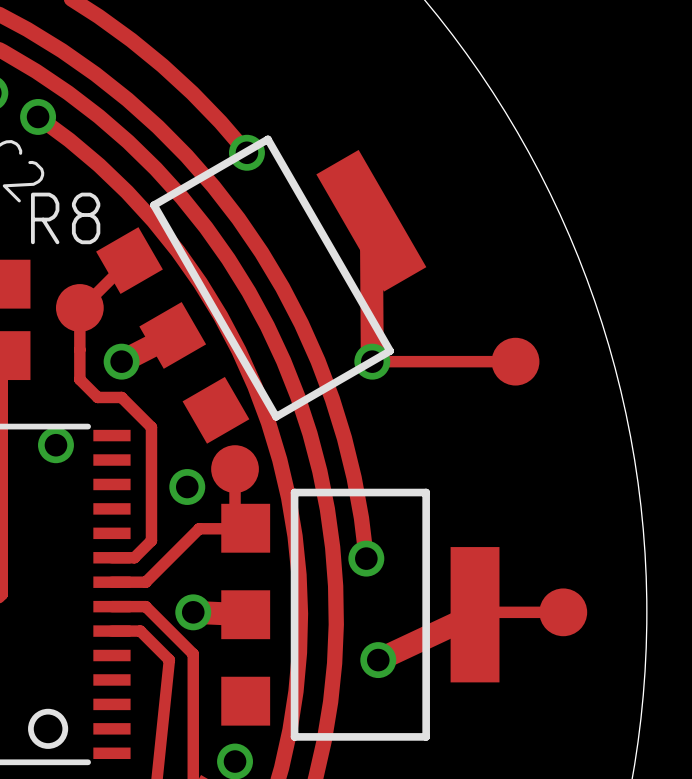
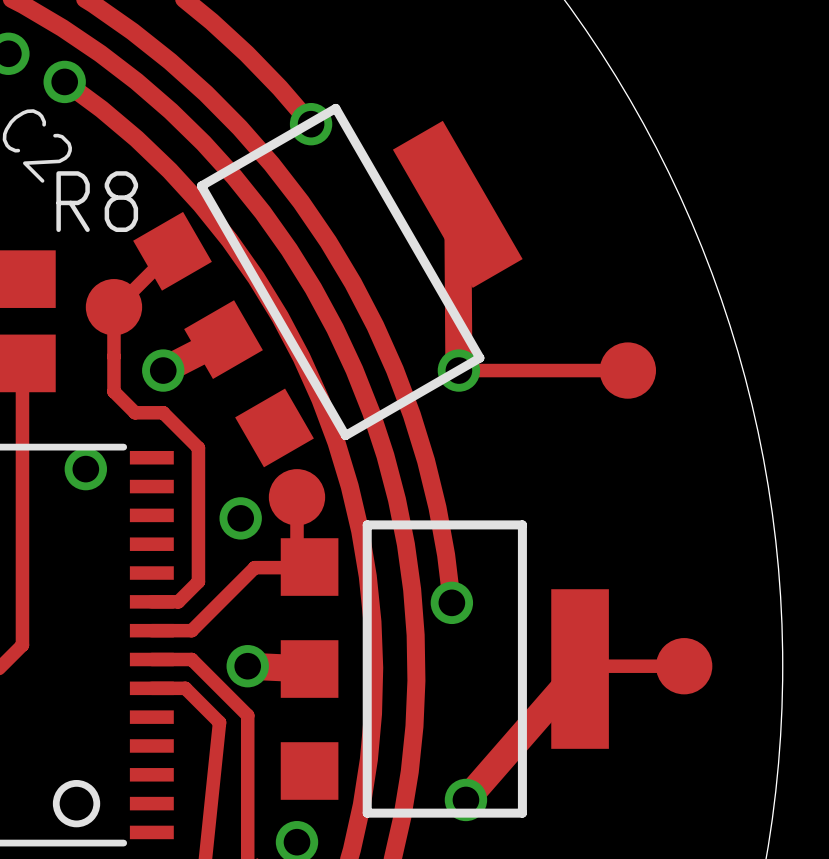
track: (475, 614) (378, 660) -> (580, 669) (465, 799)
via position: (378, 660) -> (465, 799)

